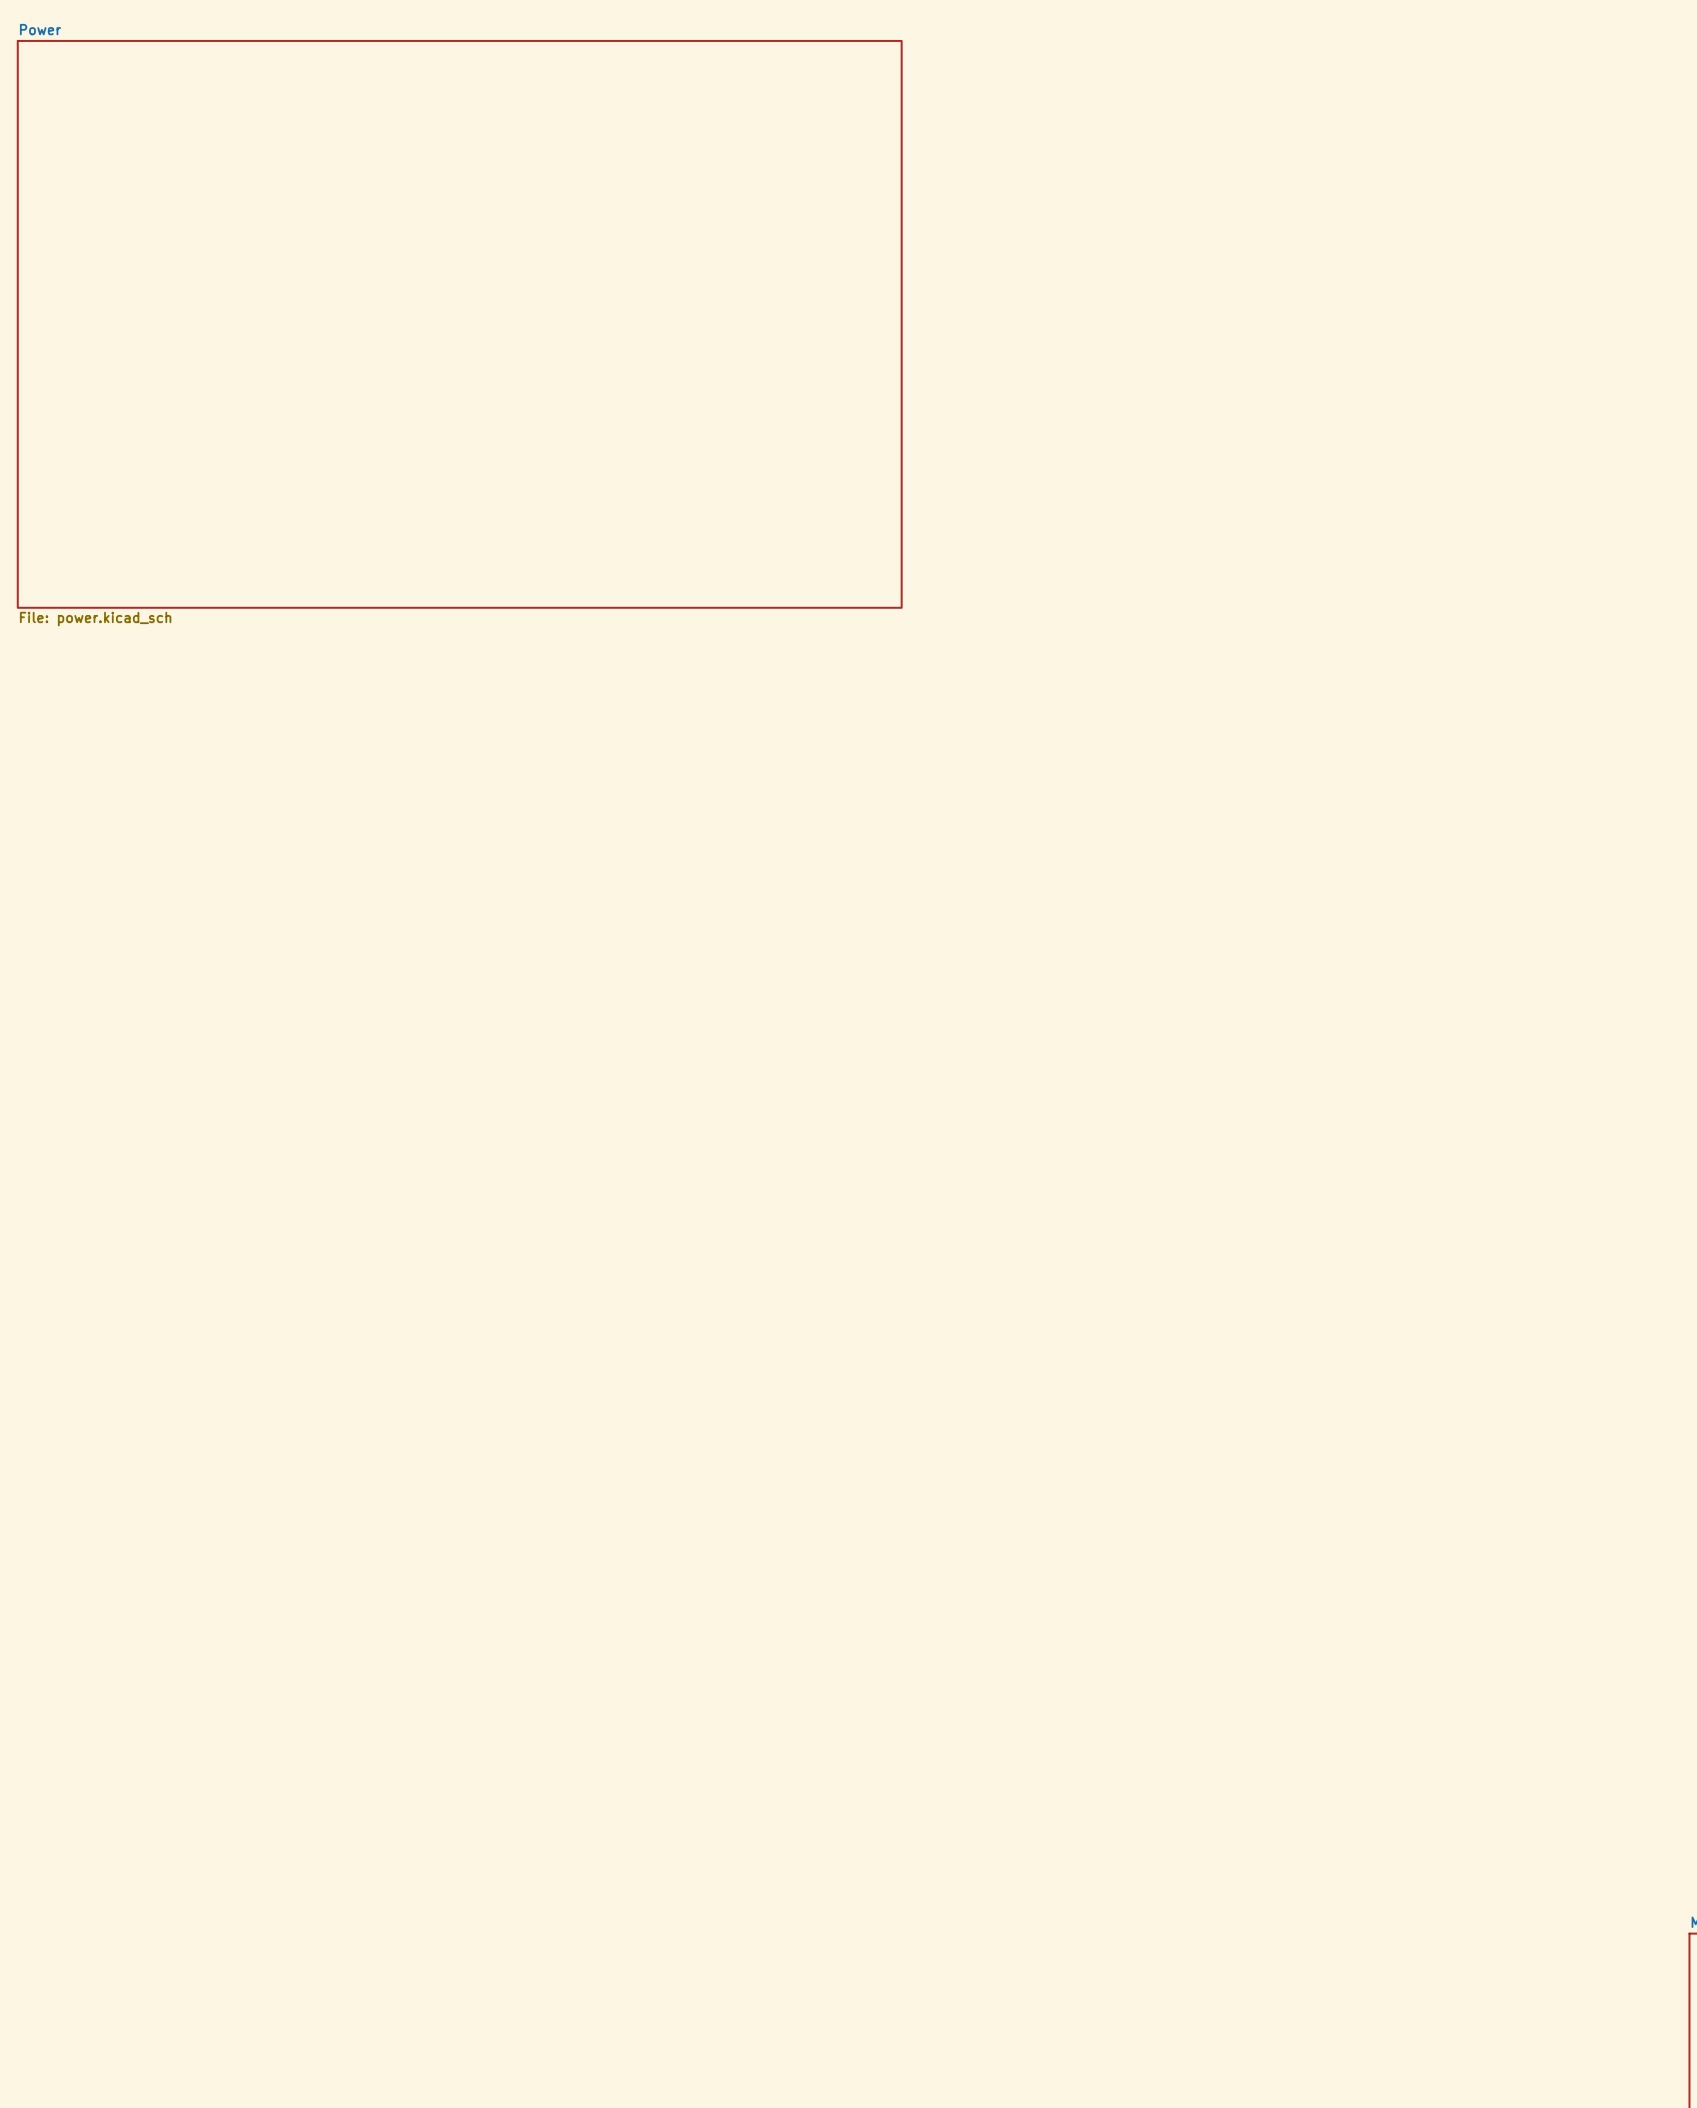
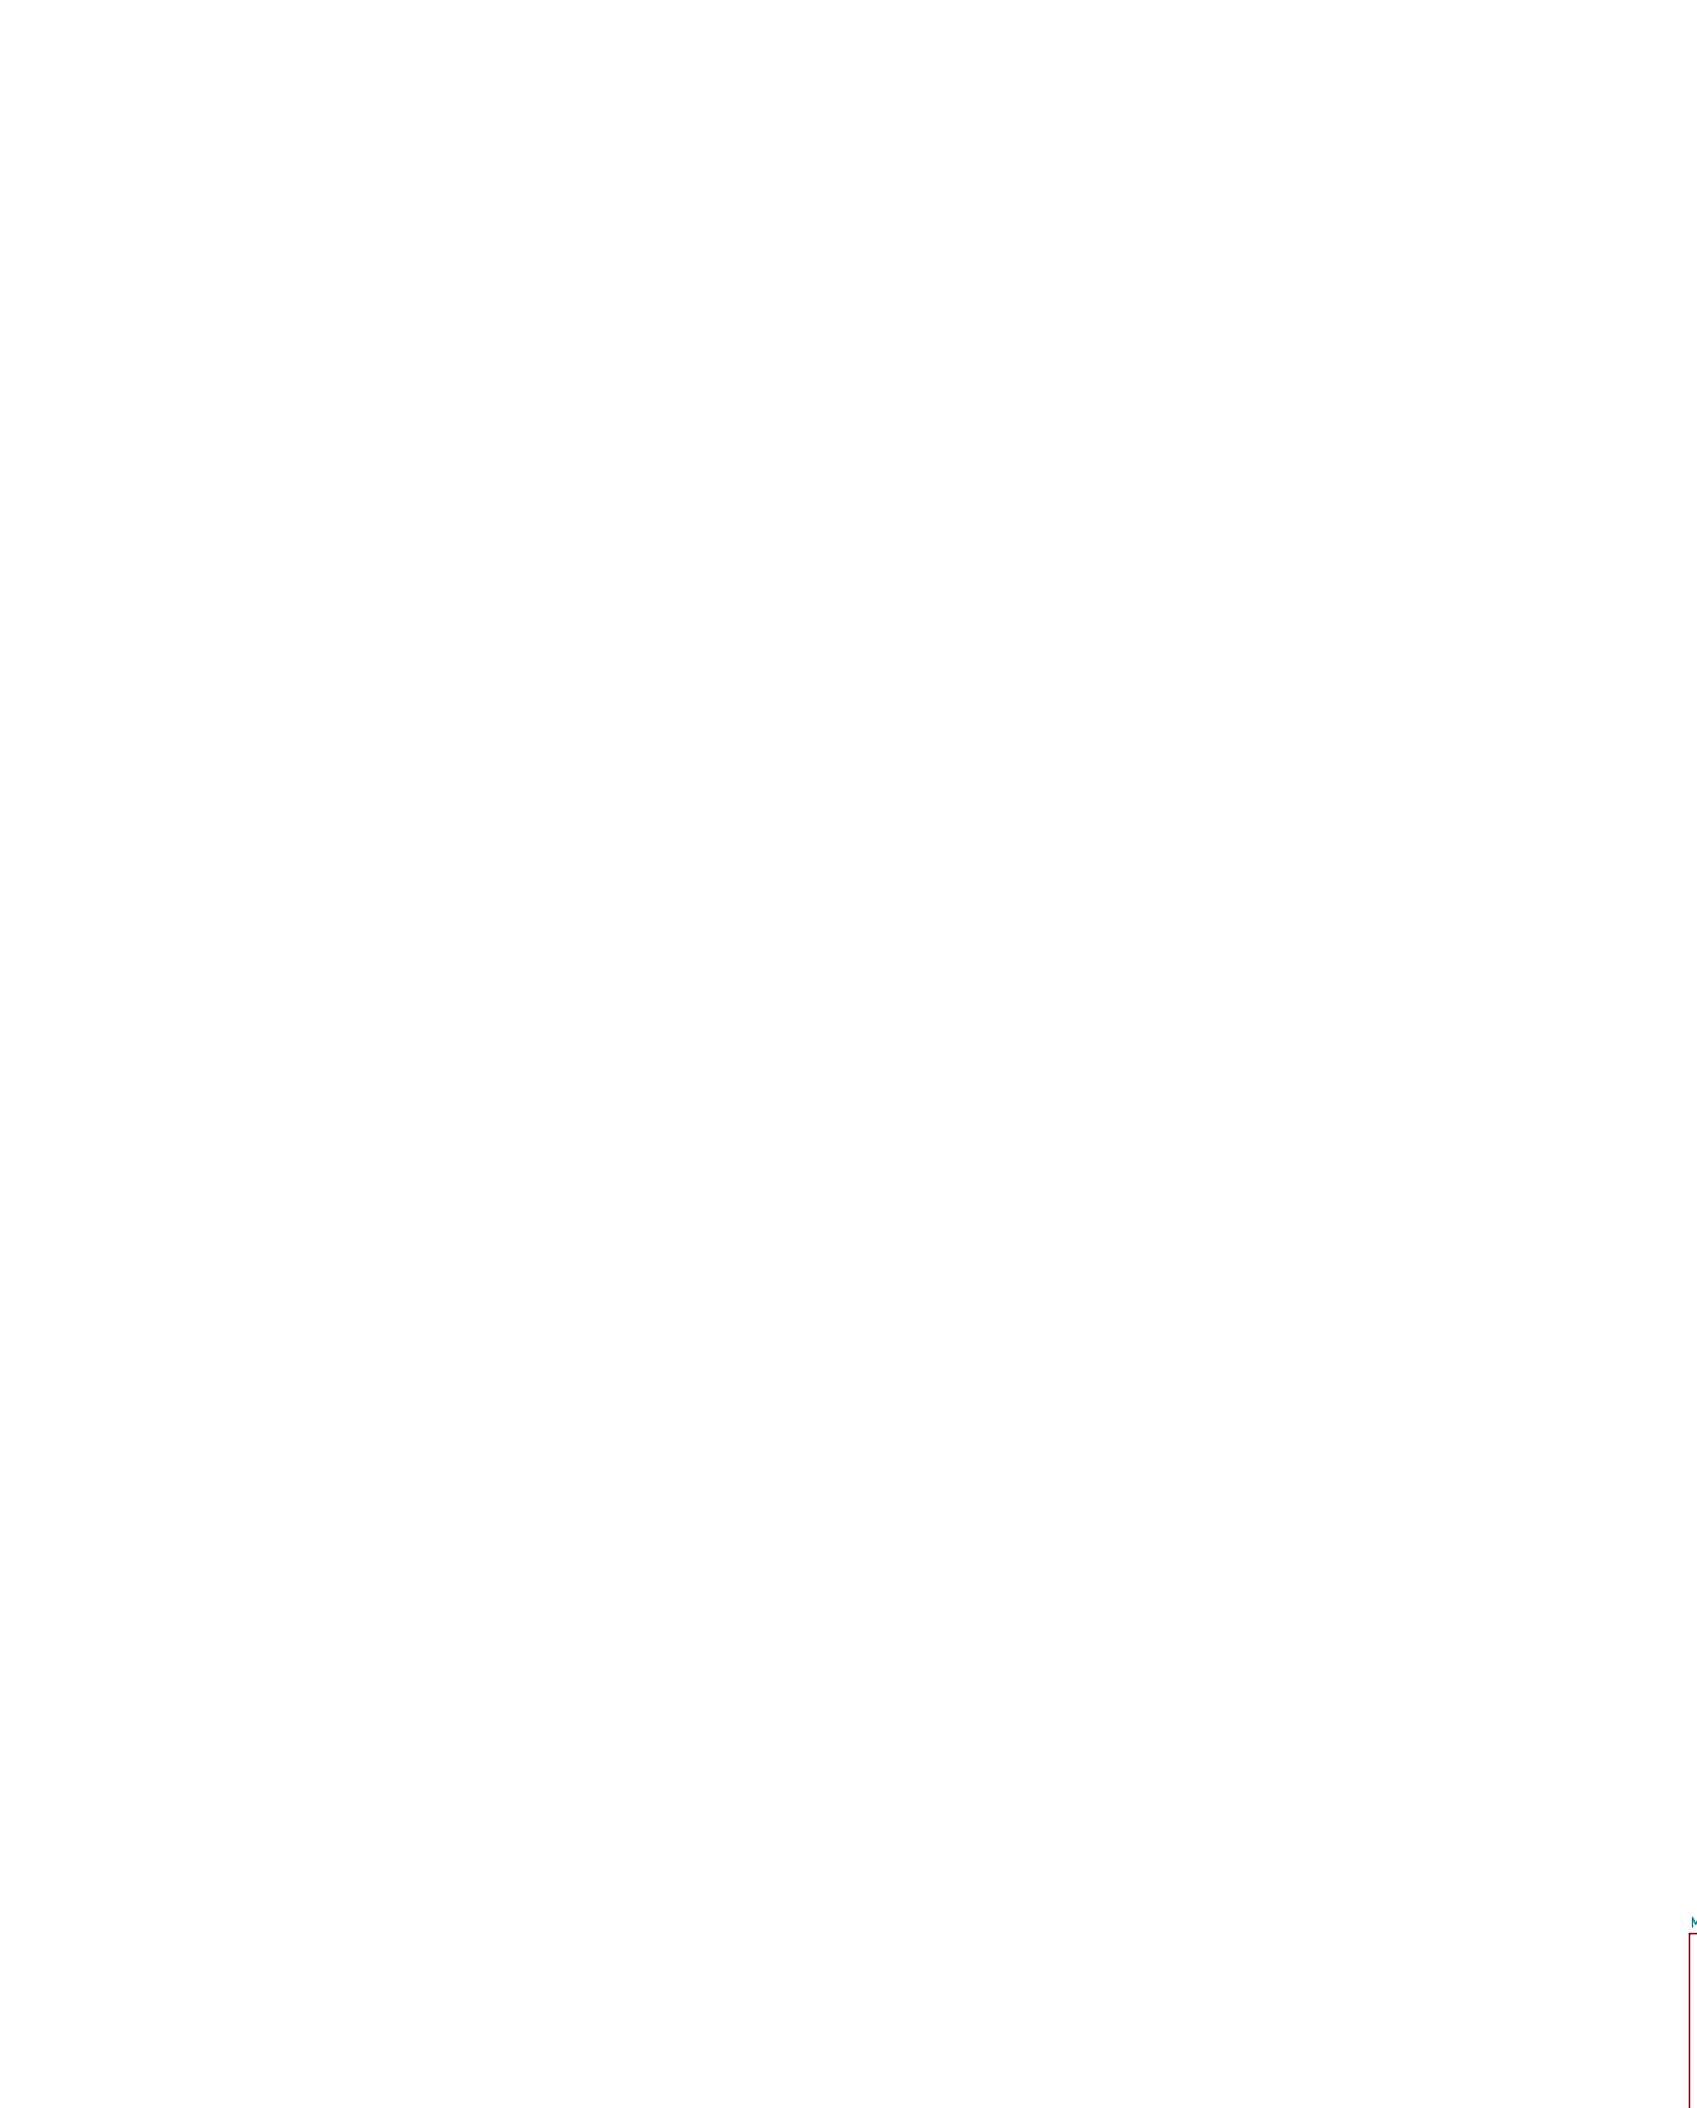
sheet Power: File: power.kicad_sch (459, 324) -> none

